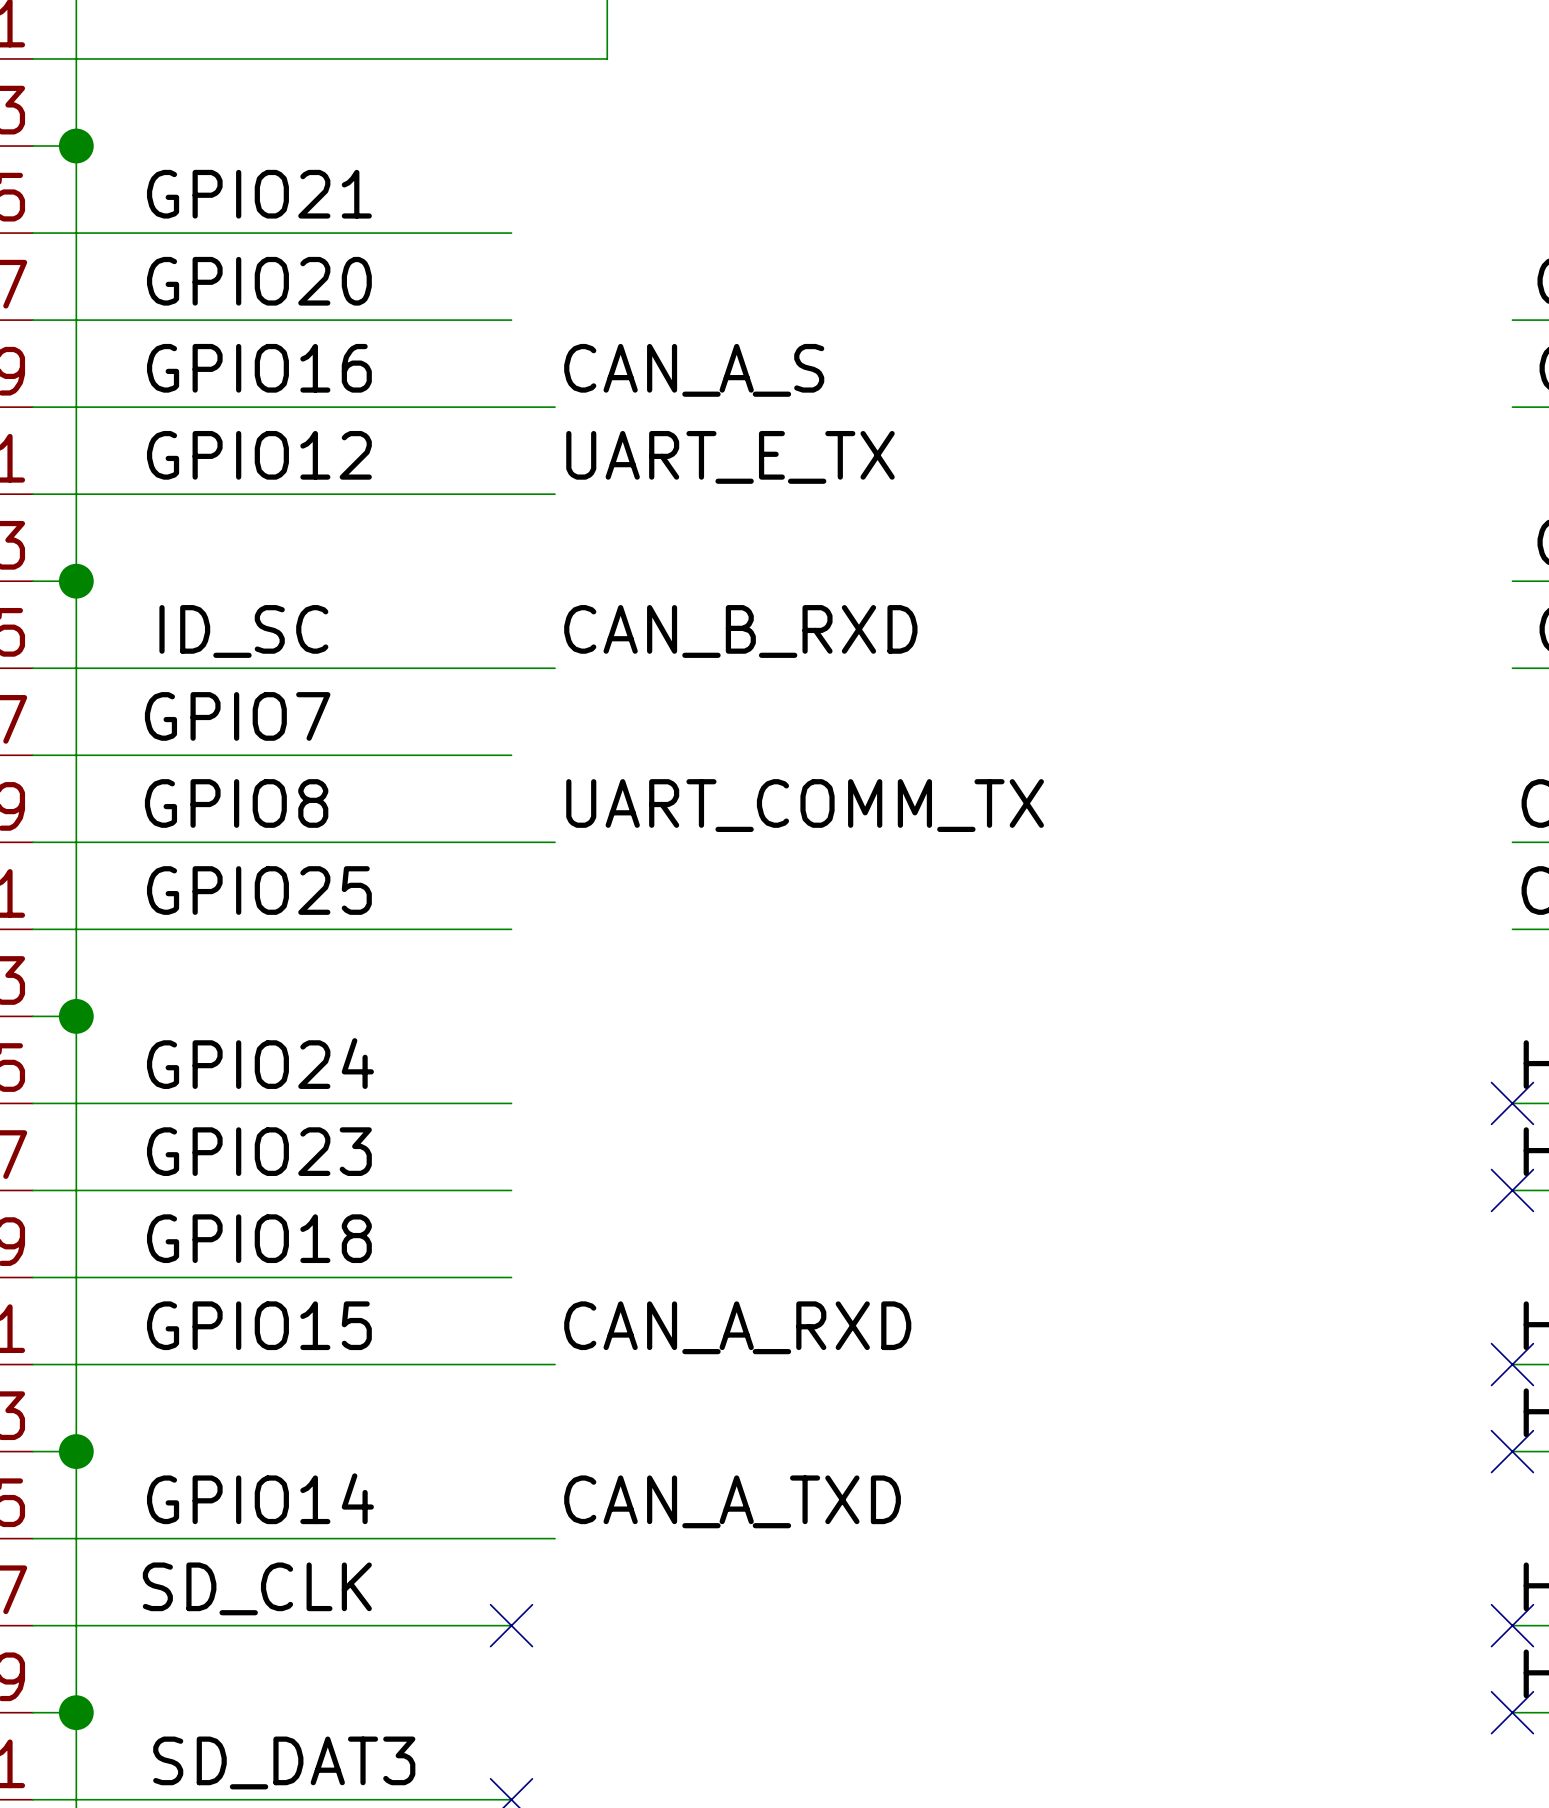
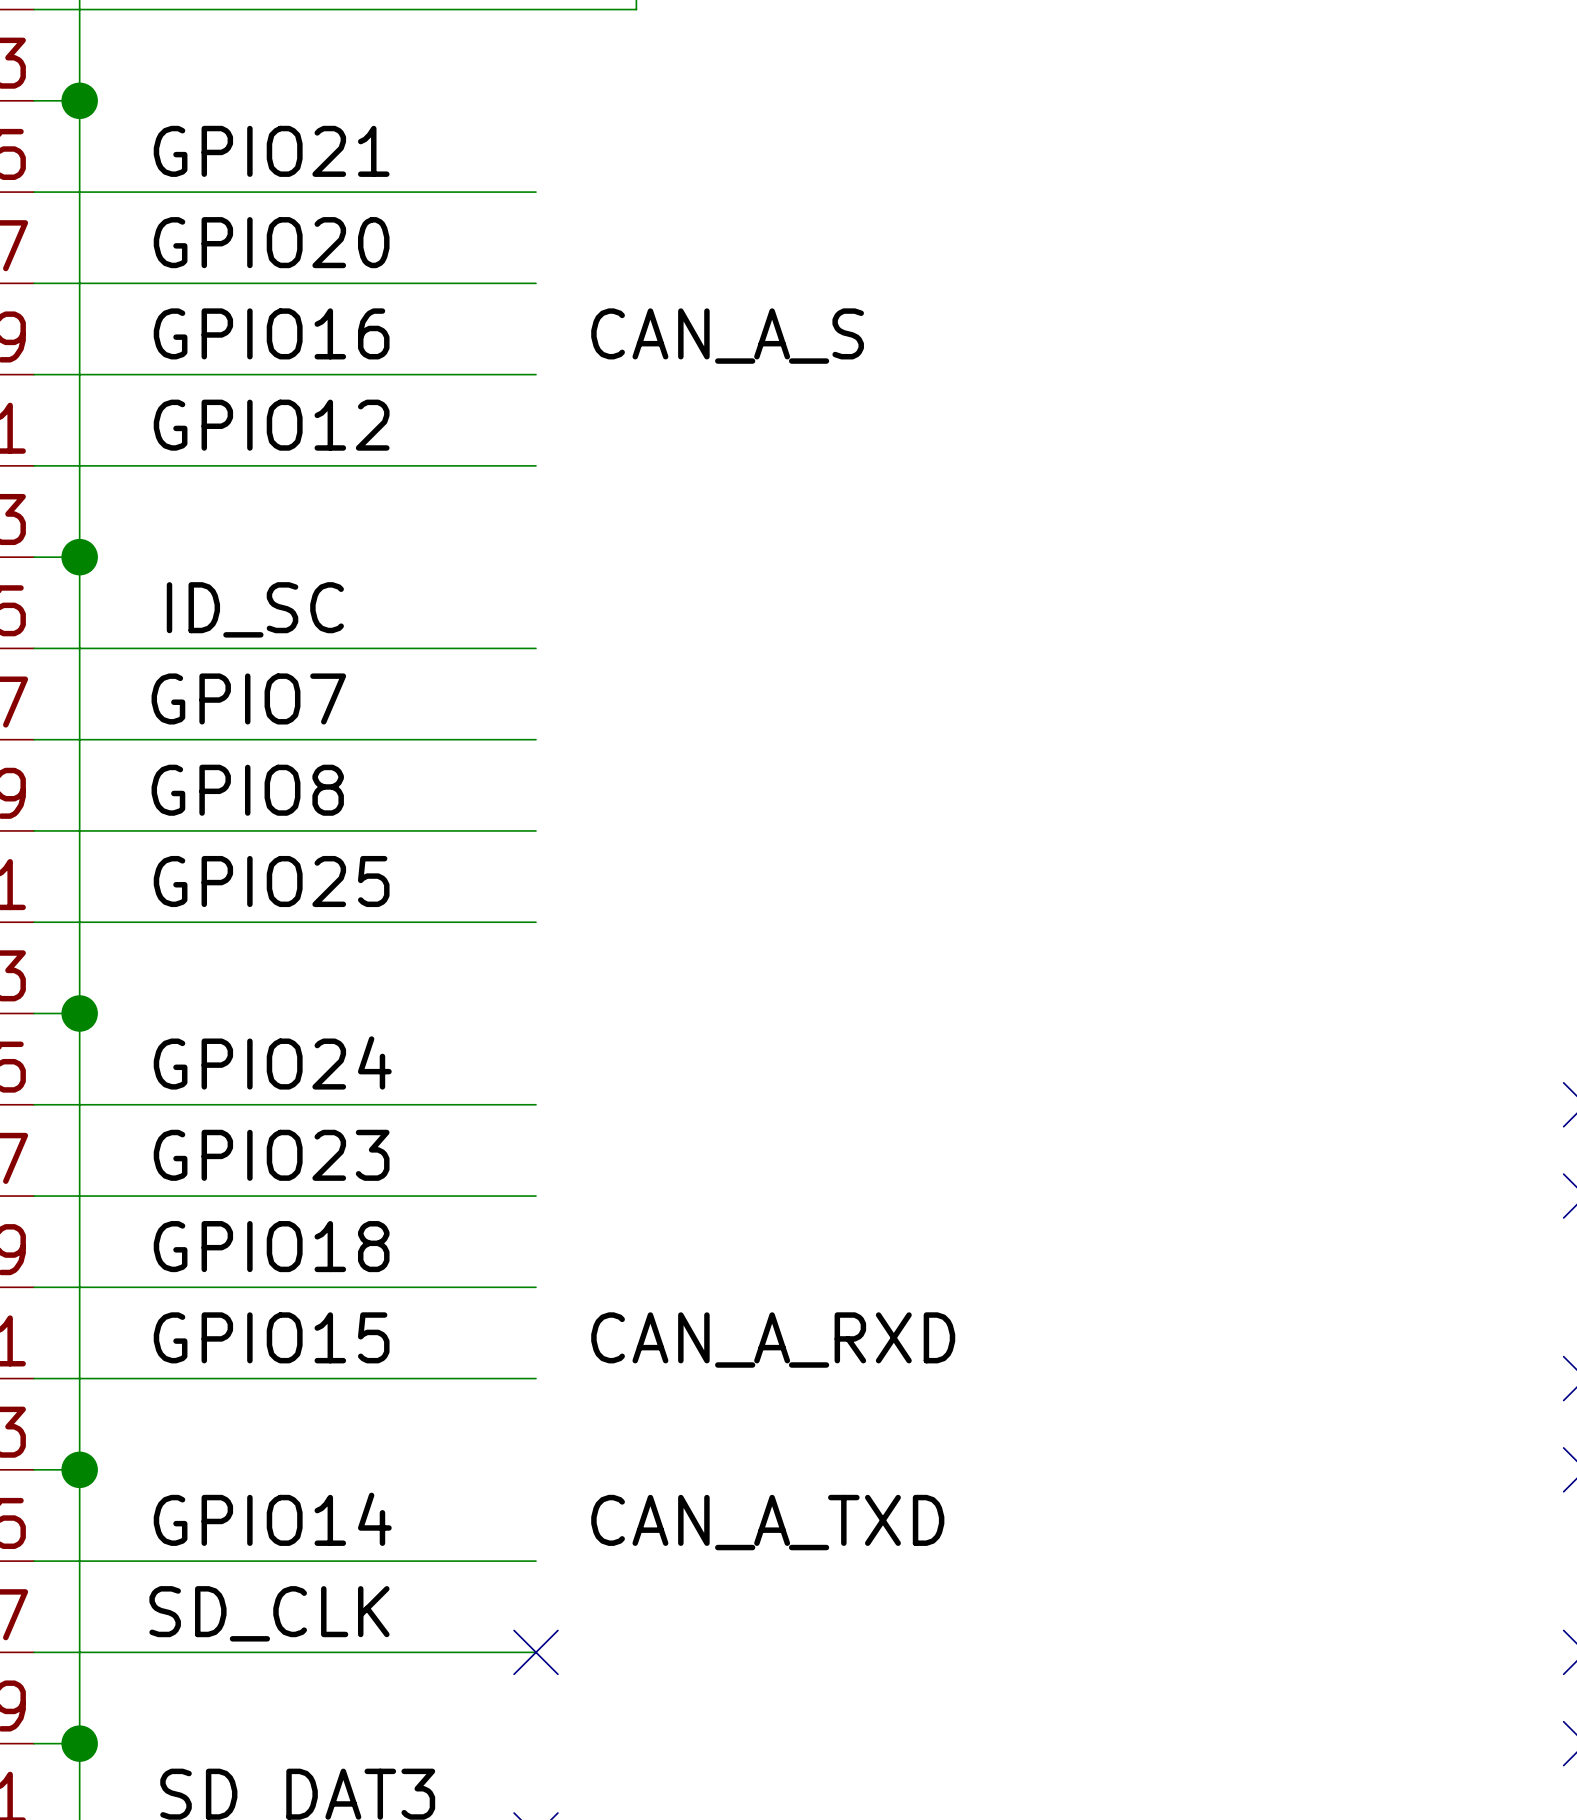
wire: (511, 407) (555, 407) -> none
label: UART_E_TX (730, 457) -> none
wire: (511, 494) (555, 494) -> none
label: CAN_B_RXD (740, 631) -> none
wire: (511, 668) (555, 668) -> none
label: UART_COMM_TX (805, 805) -> none
wire: (511, 842) (555, 842) -> none
wire: (511, 1364) (555, 1364) -> none
wire: (511, 1538) (555, 1538) -> none

